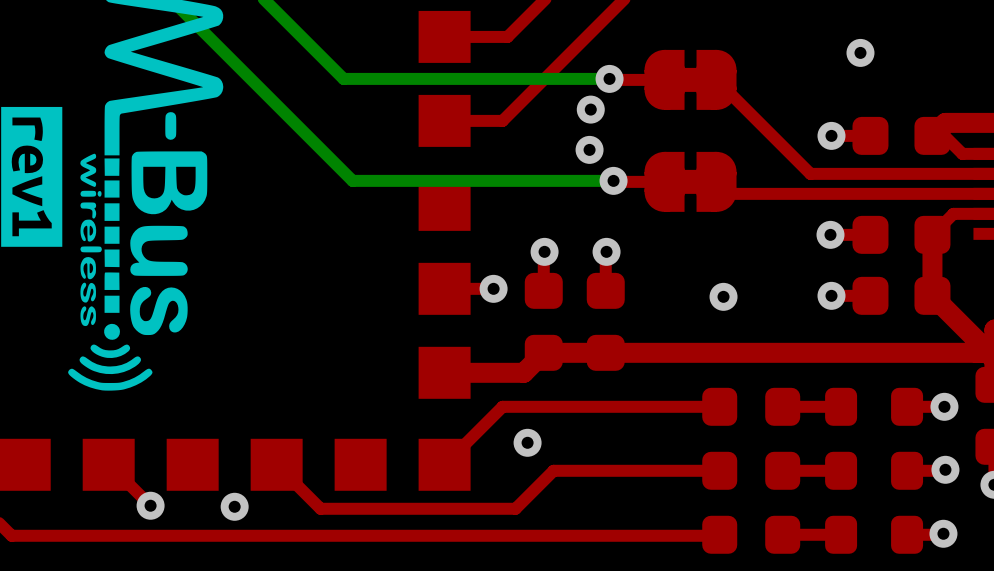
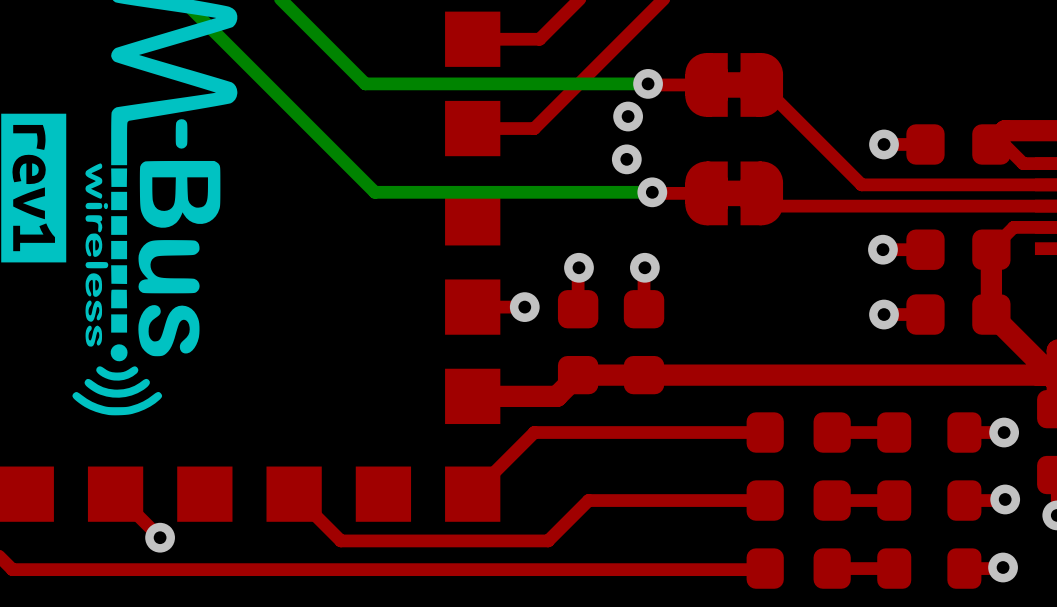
via: (860, 52) -> none
via: (723, 296) -> none
via: (527, 442) -> none
via: (234, 506) -> none

